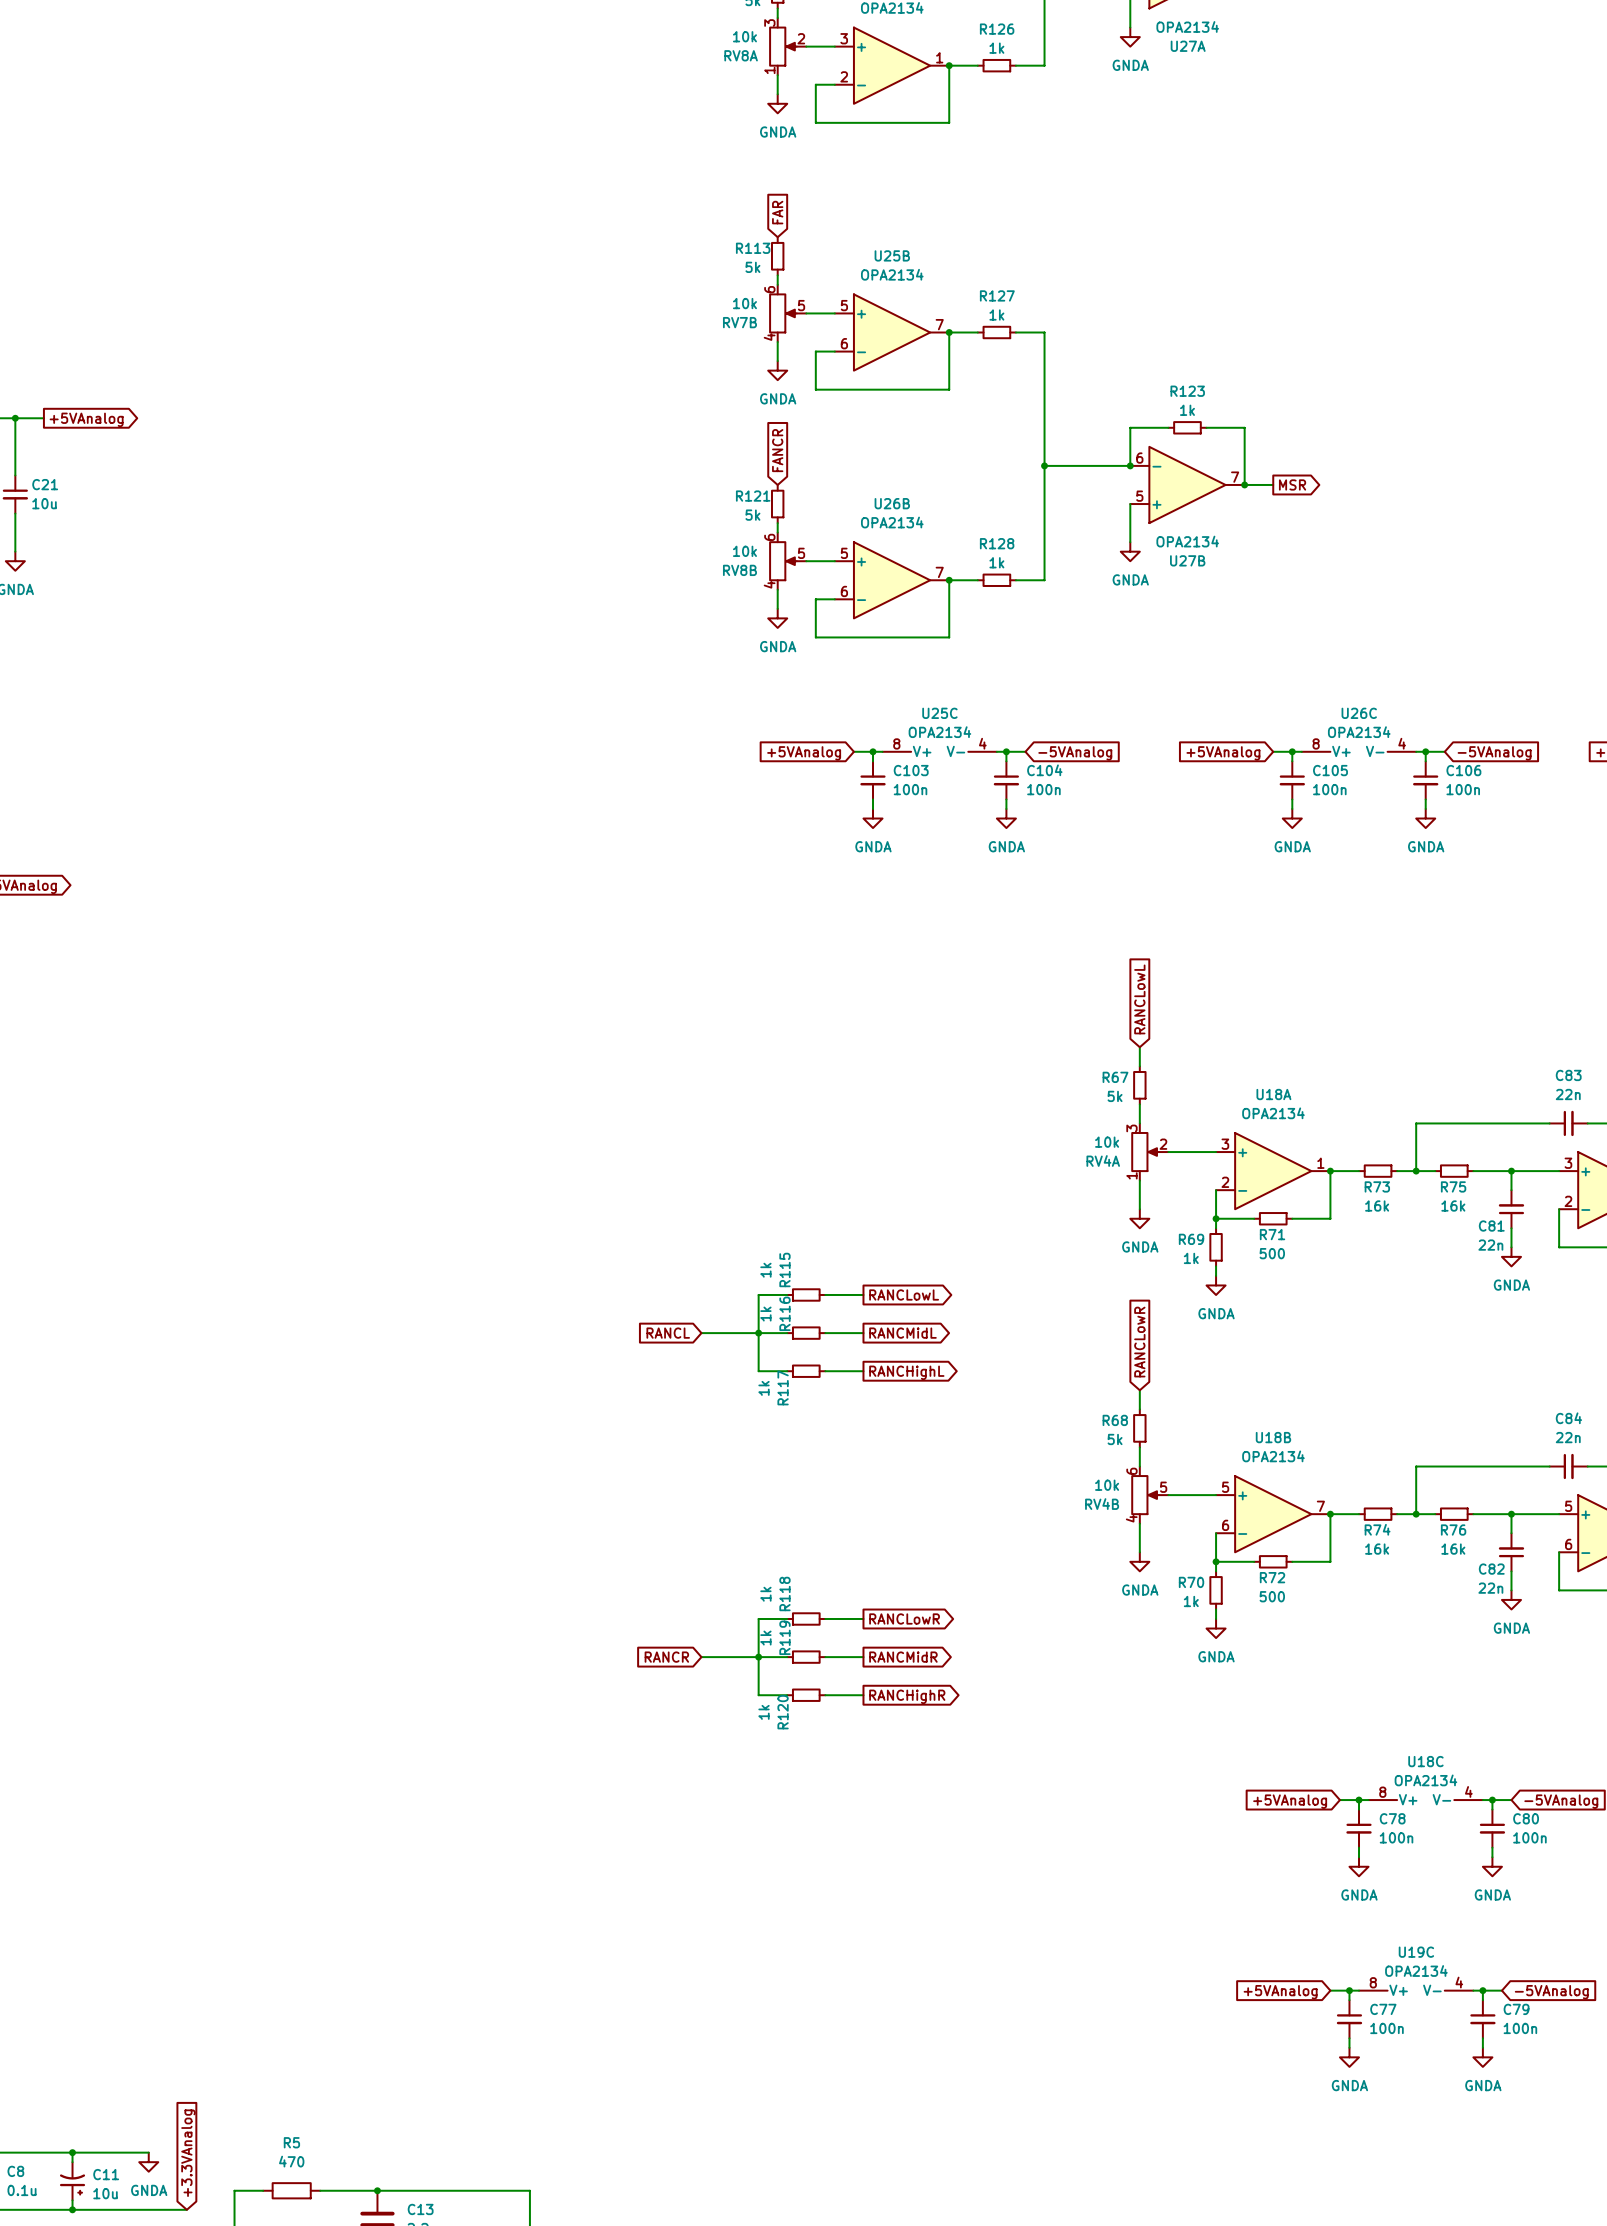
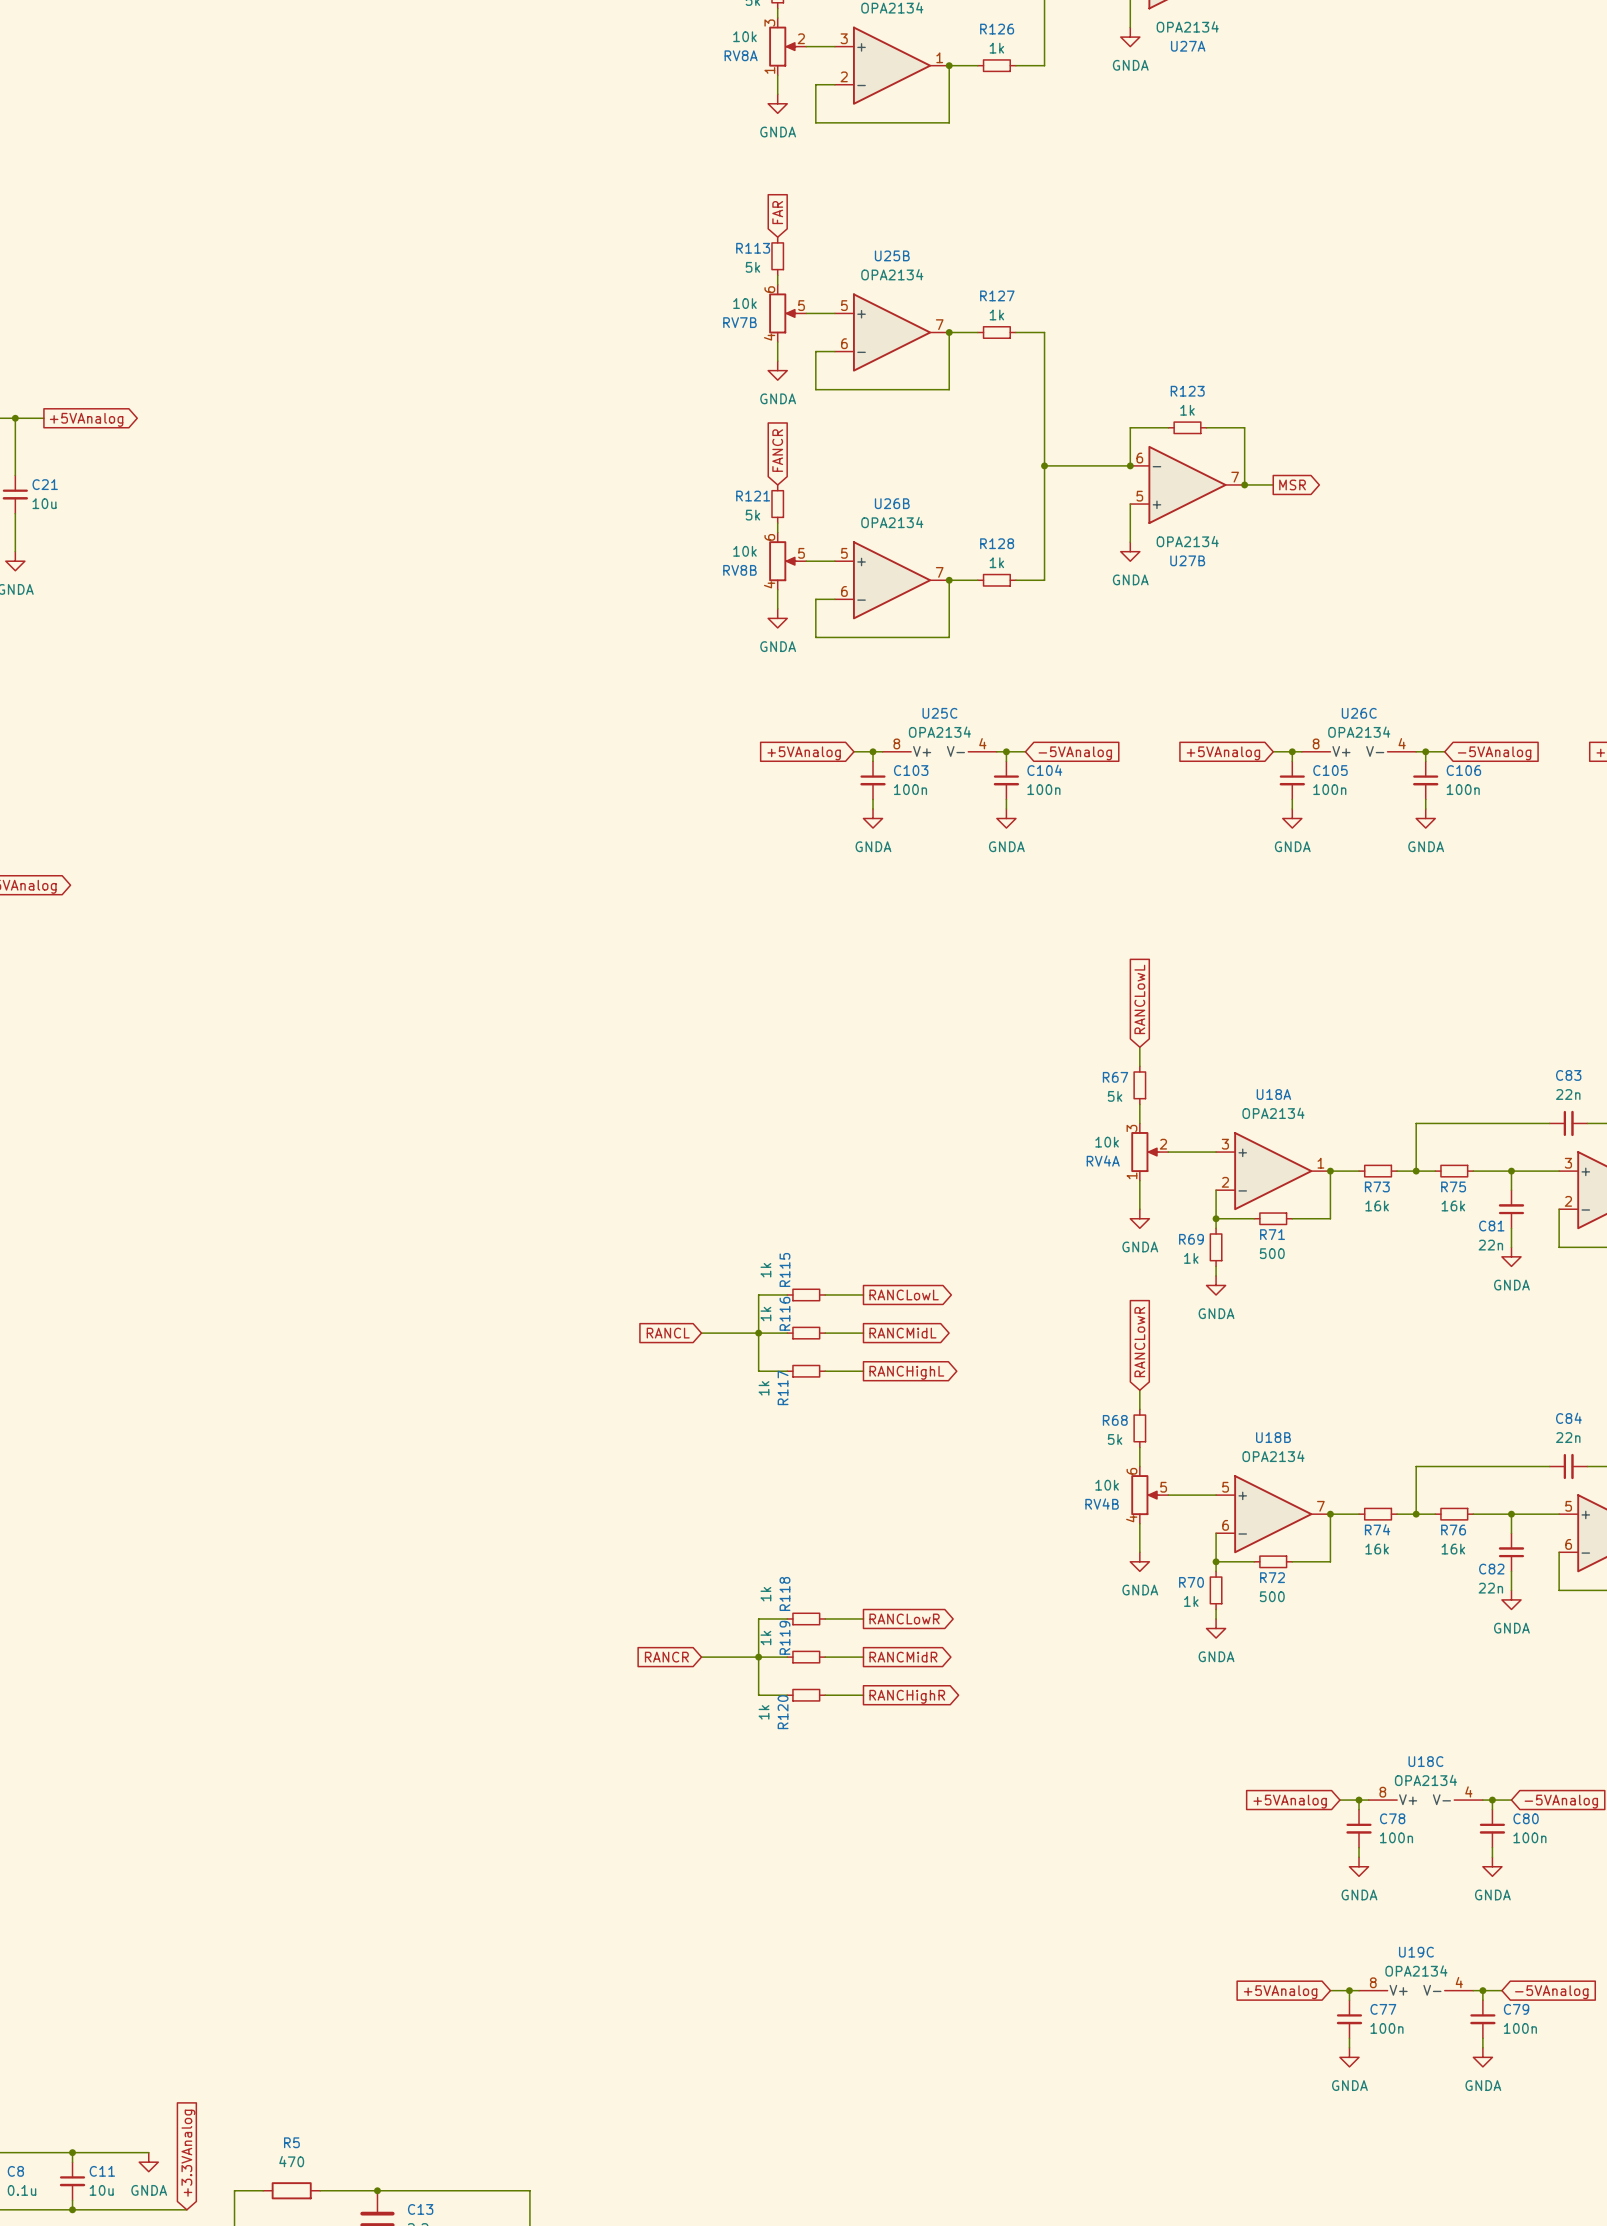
C11 symbol: [59, 2162, 86, 2201] -> [59, 2162, 86, 2201]

